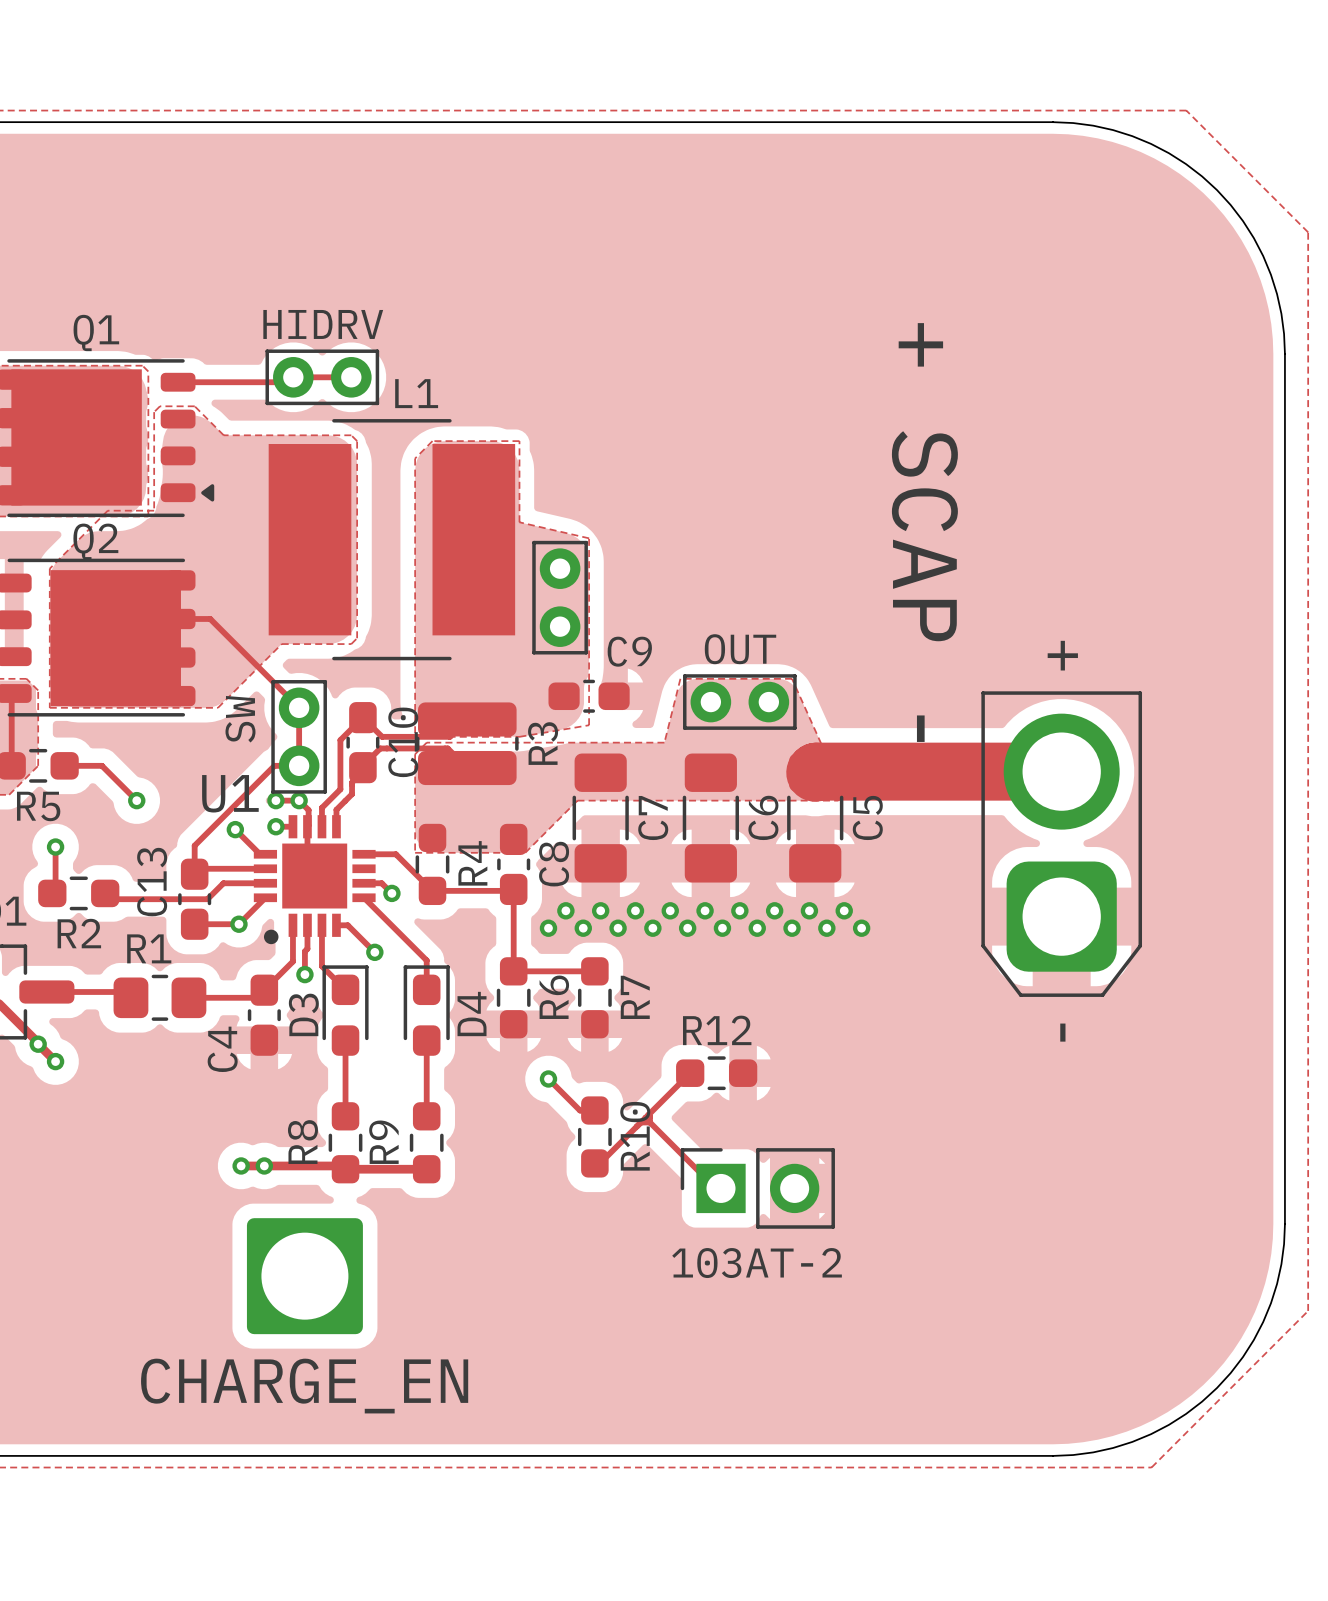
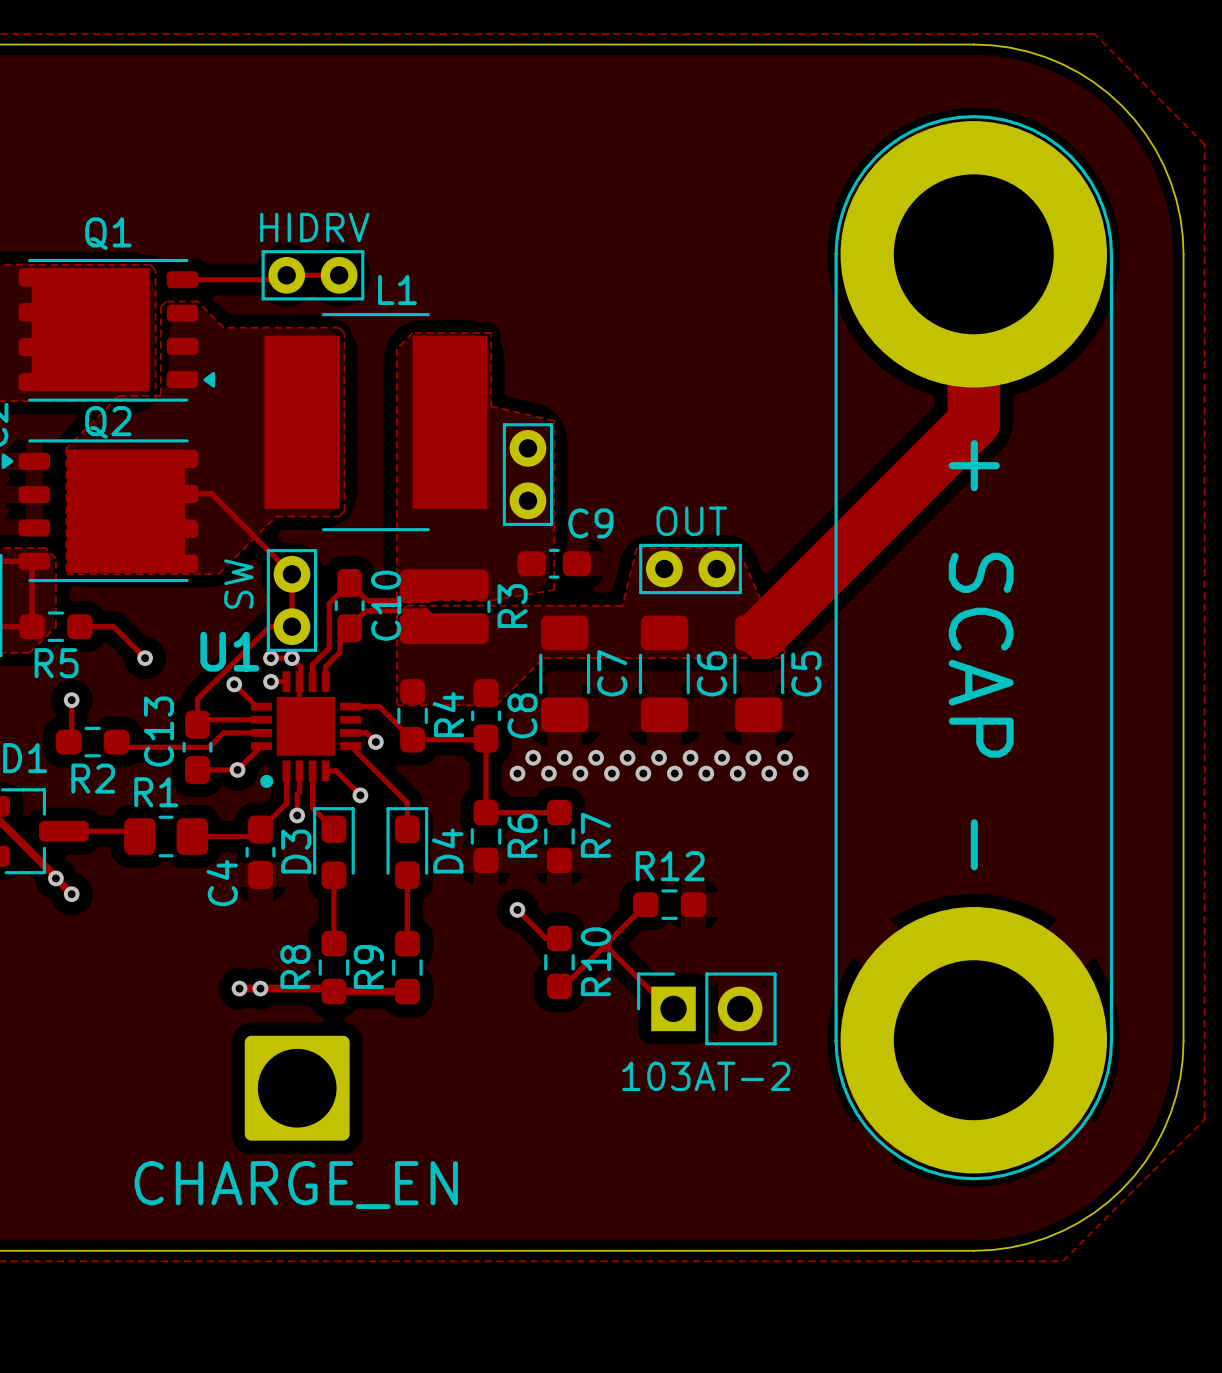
track: none -> (973, 254) (973, 422) (763, 632)
text position: + SCAP - (924, 532) -> + SCAP - (981, 655)
track: (1061, 771) (815, 772) -> none
part: none -> (973, 647)
part: (1061, 844) -> none

